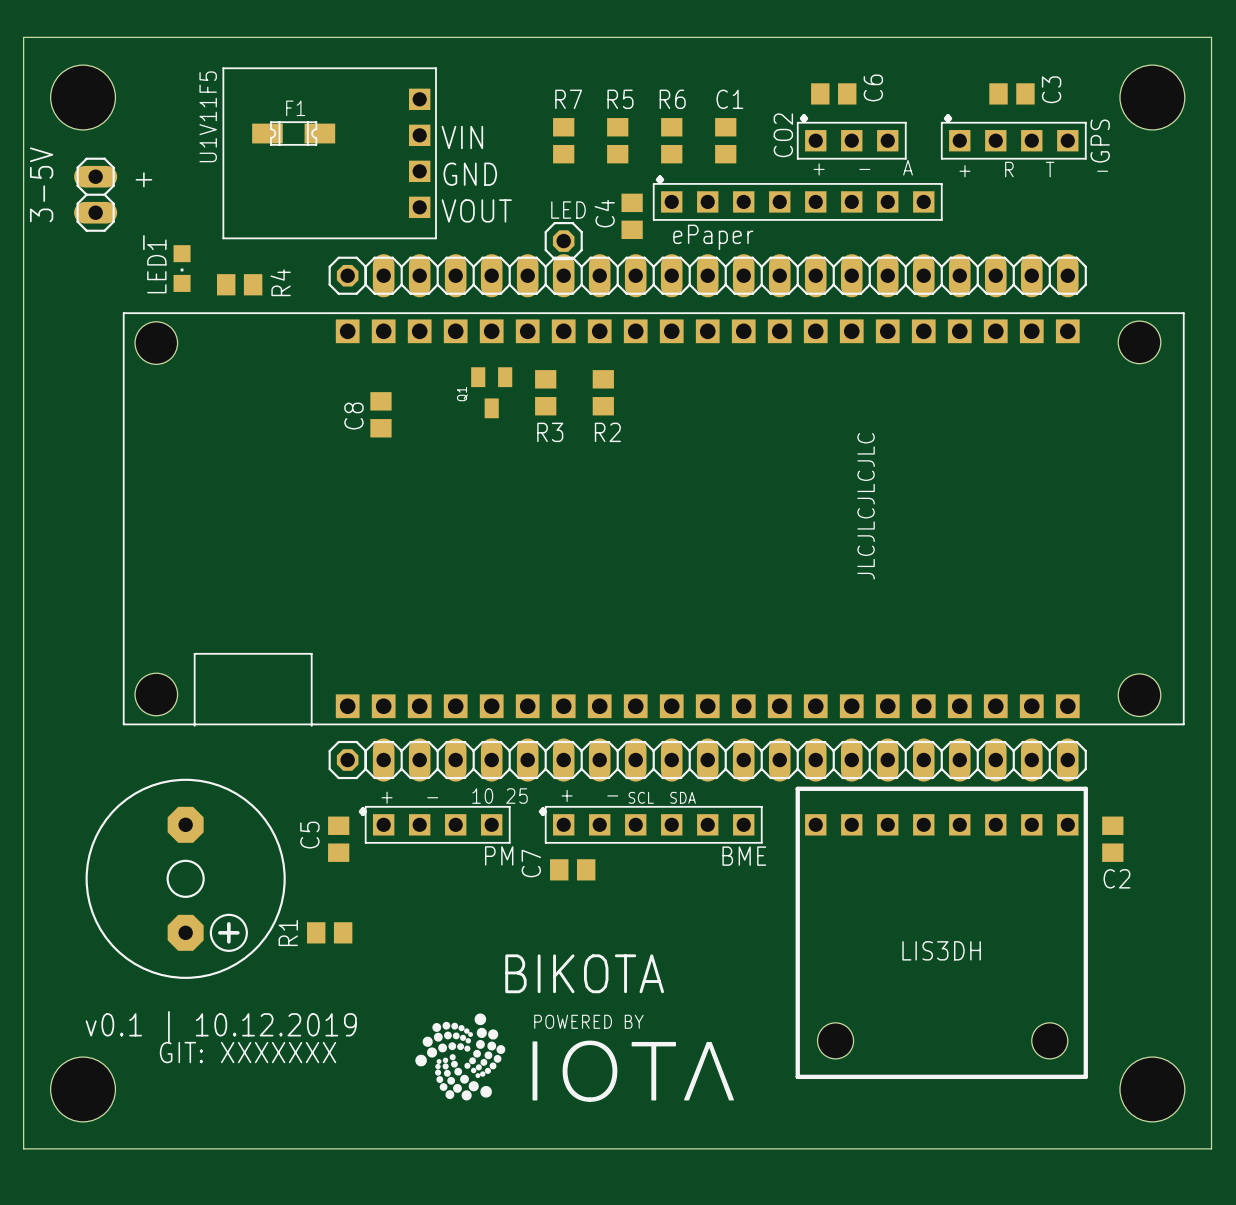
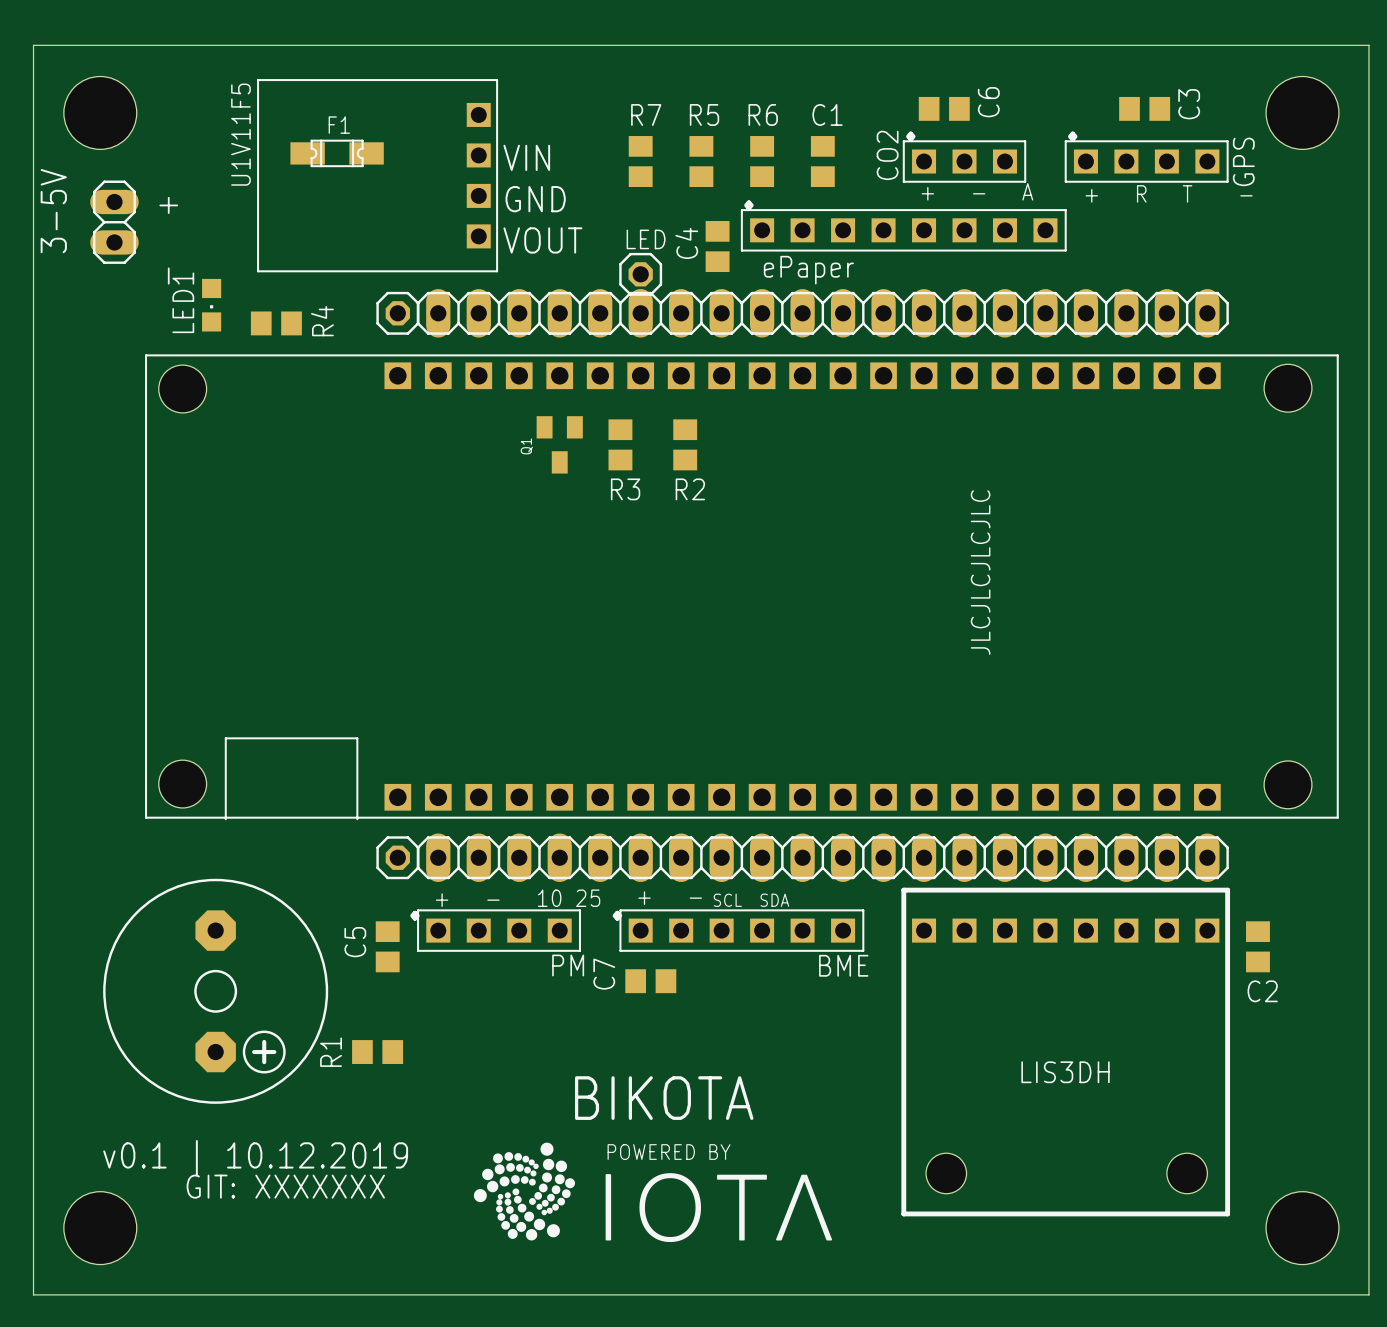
C8: (380, 414) -> none

